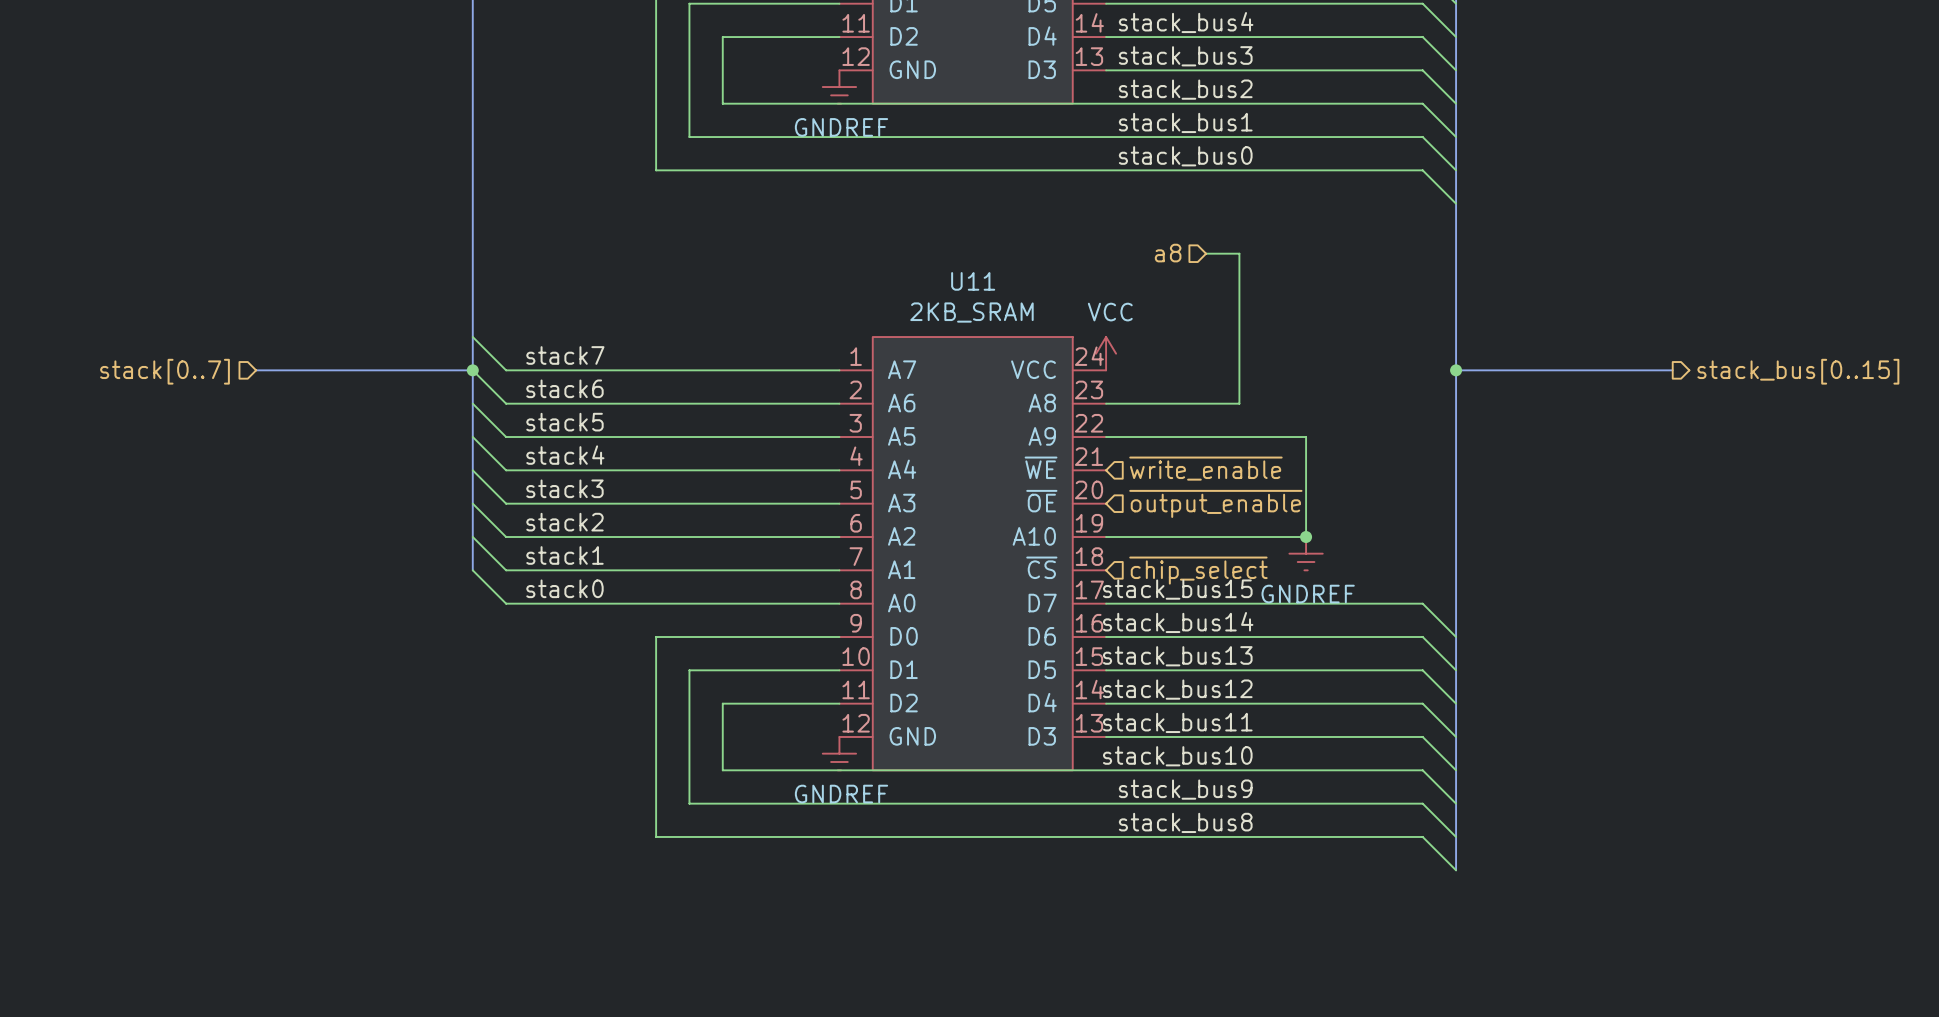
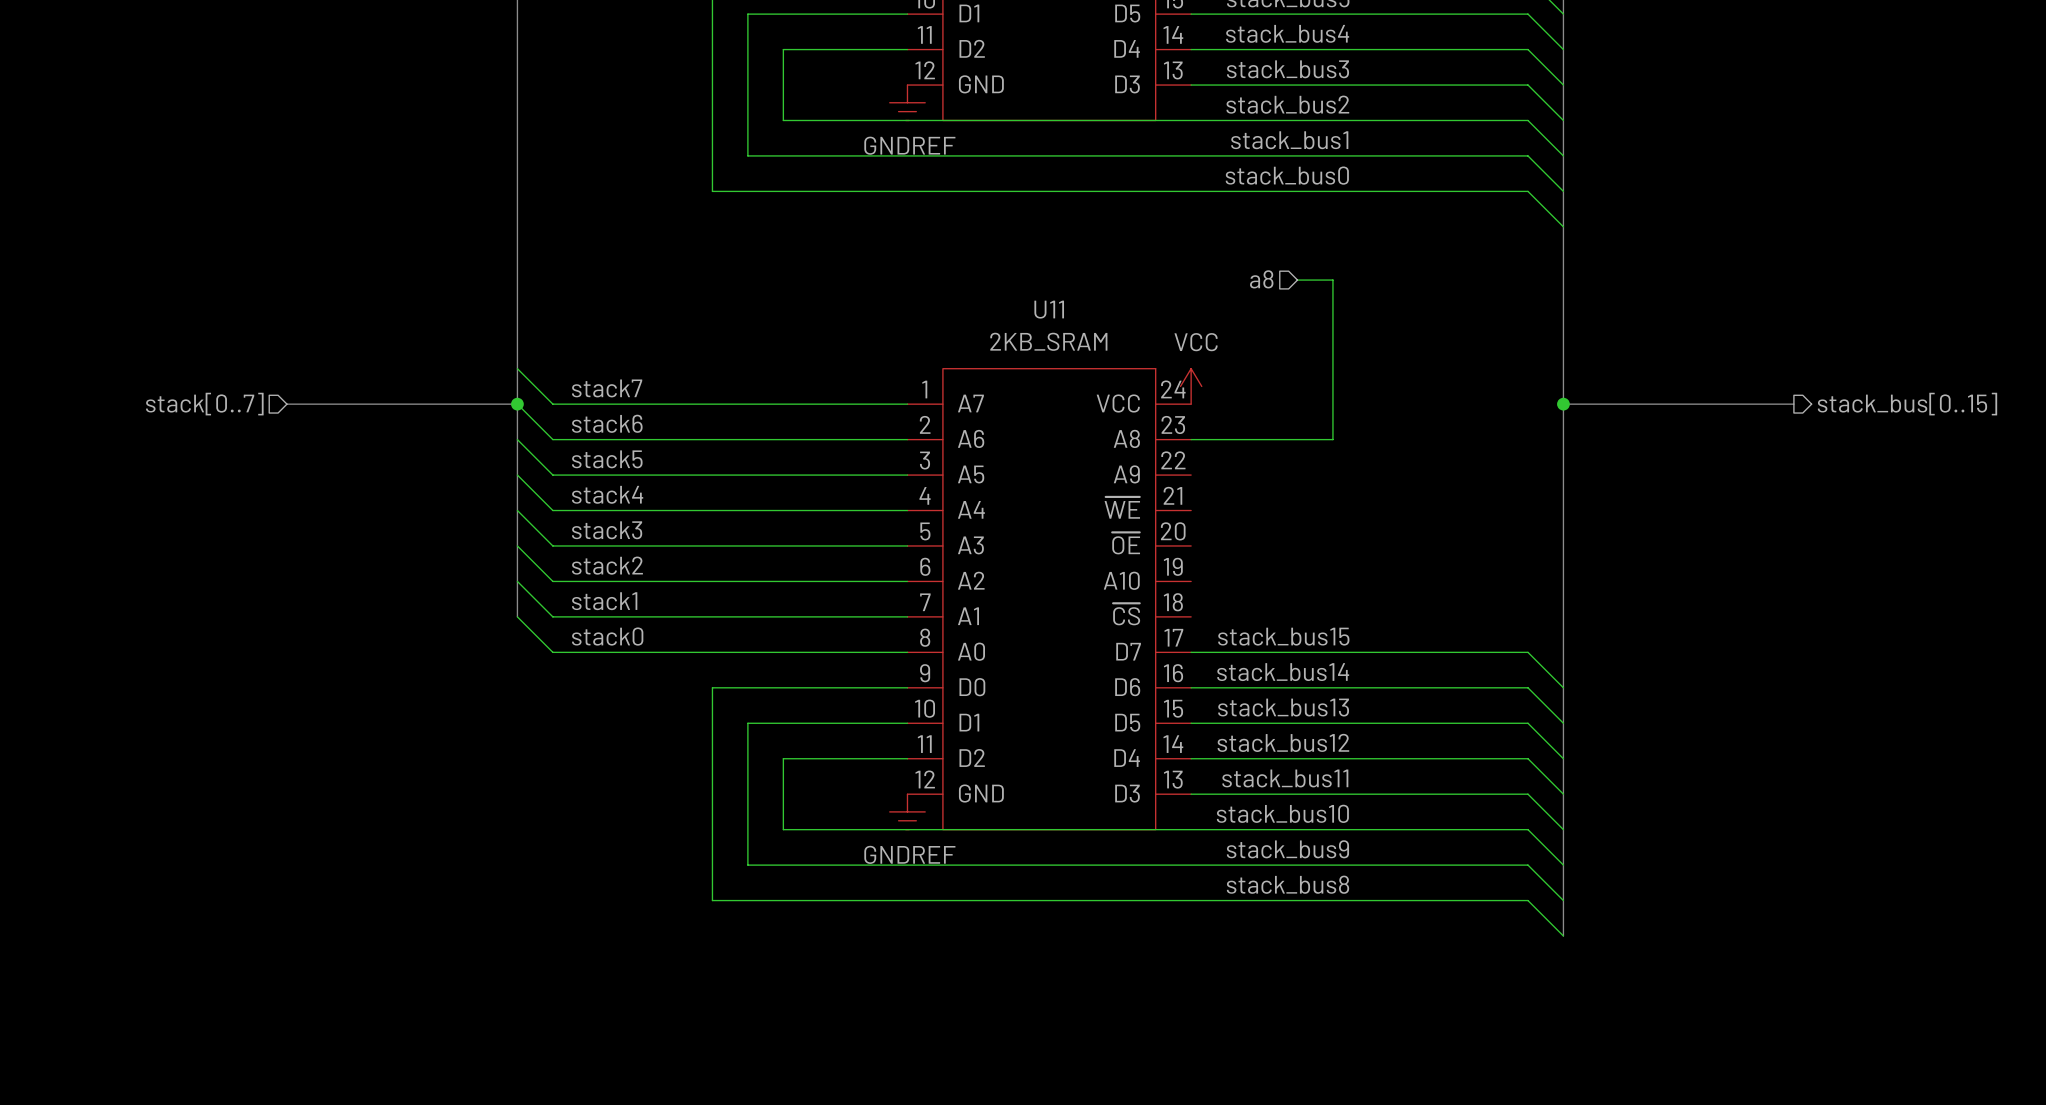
wire: (1106, 437) (1306, 437) (1306, 537) (1106, 537) -> none
hierarchical label: ~{write_enable} (1205, 468) -> none
hierarchical label: ~{output_enable} (1215, 503) -> none
junction: (1306, 537) -> none
power symbol: GNDREF (1306, 553) -> none
hierarchical label: ~{chip_select} (1198, 570) -> none

